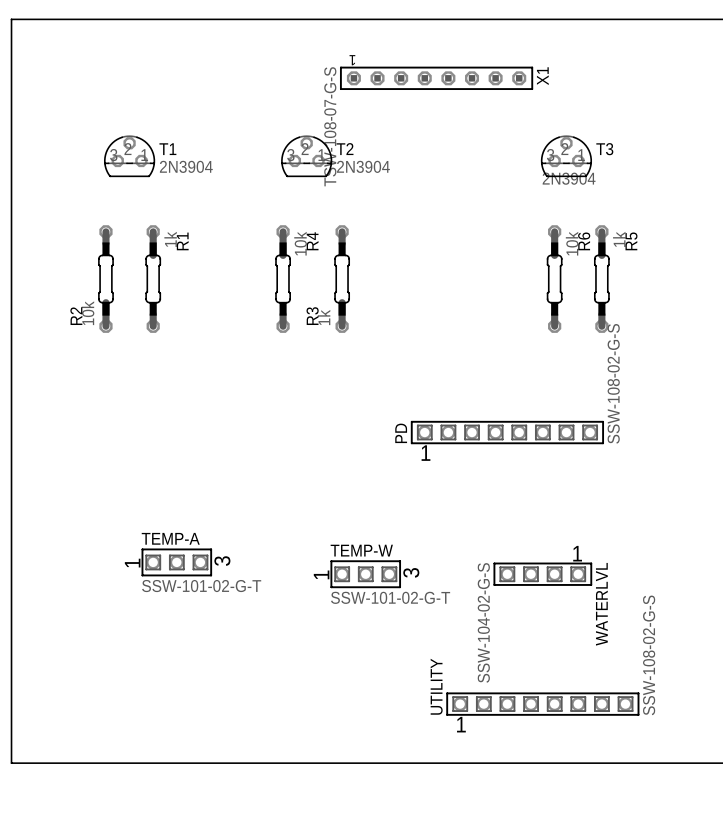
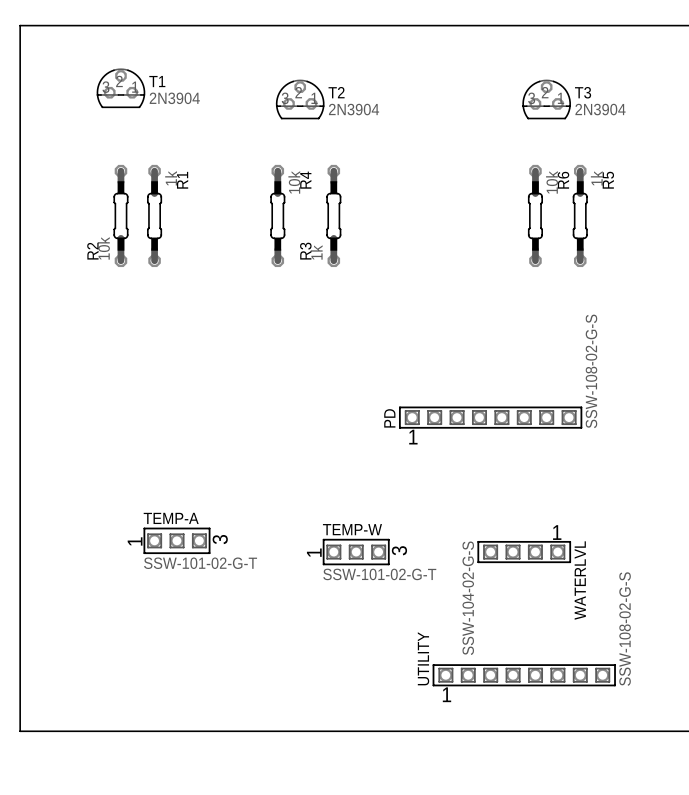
X1: TSW-108-07-G-S (436, 78) -> none
T1 position: (129, 156) -> (120, 88)
T2 position: (306, 156) -> (300, 99)
T3 position: (566, 156) -> (546, 99)
T3 value position: 2N3904 (569, 178) -> 2N3904 (600, 109)
R2 position: (105, 279) -> (120, 215)
R1 position: (153, 279) -> (154, 215)
R4 position: (283, 279) -> (277, 215)
R3 position: (342, 279) -> (333, 215)
R6 position: (554, 279) -> (535, 215)
R5 position: (601, 279) -> (580, 215)

